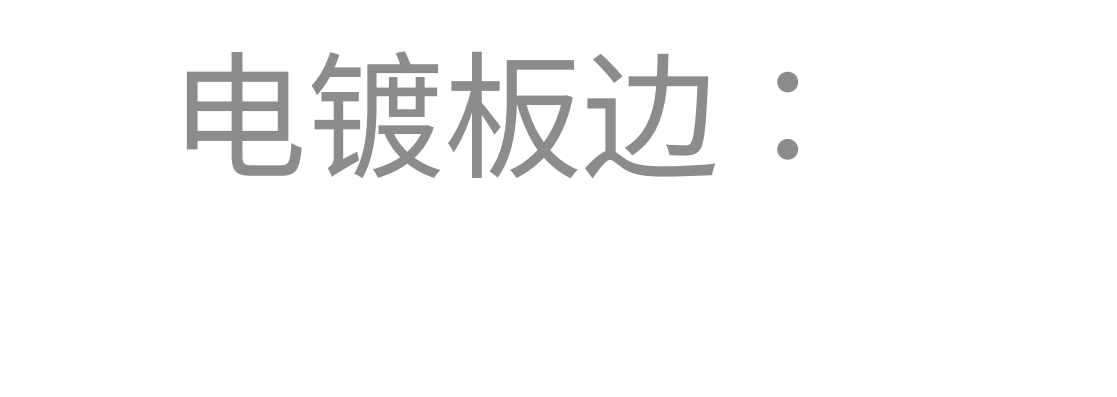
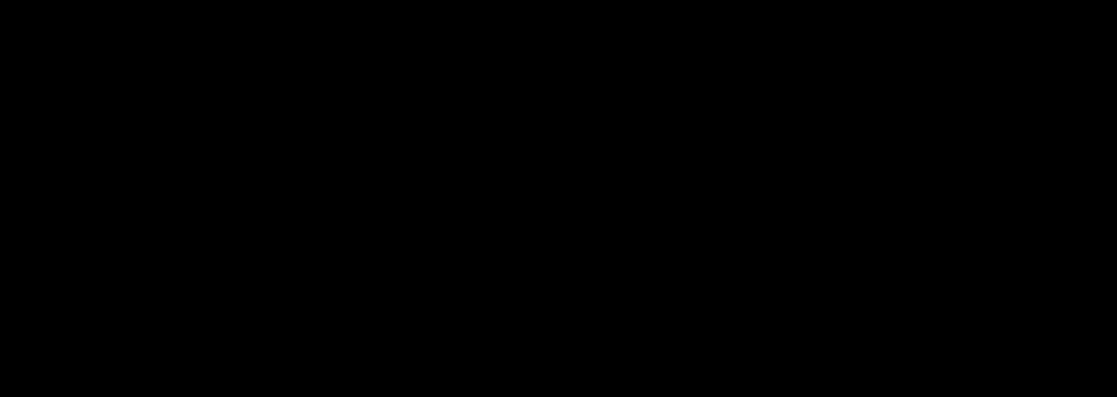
text: 电镀板边： (492, 114) -> none

